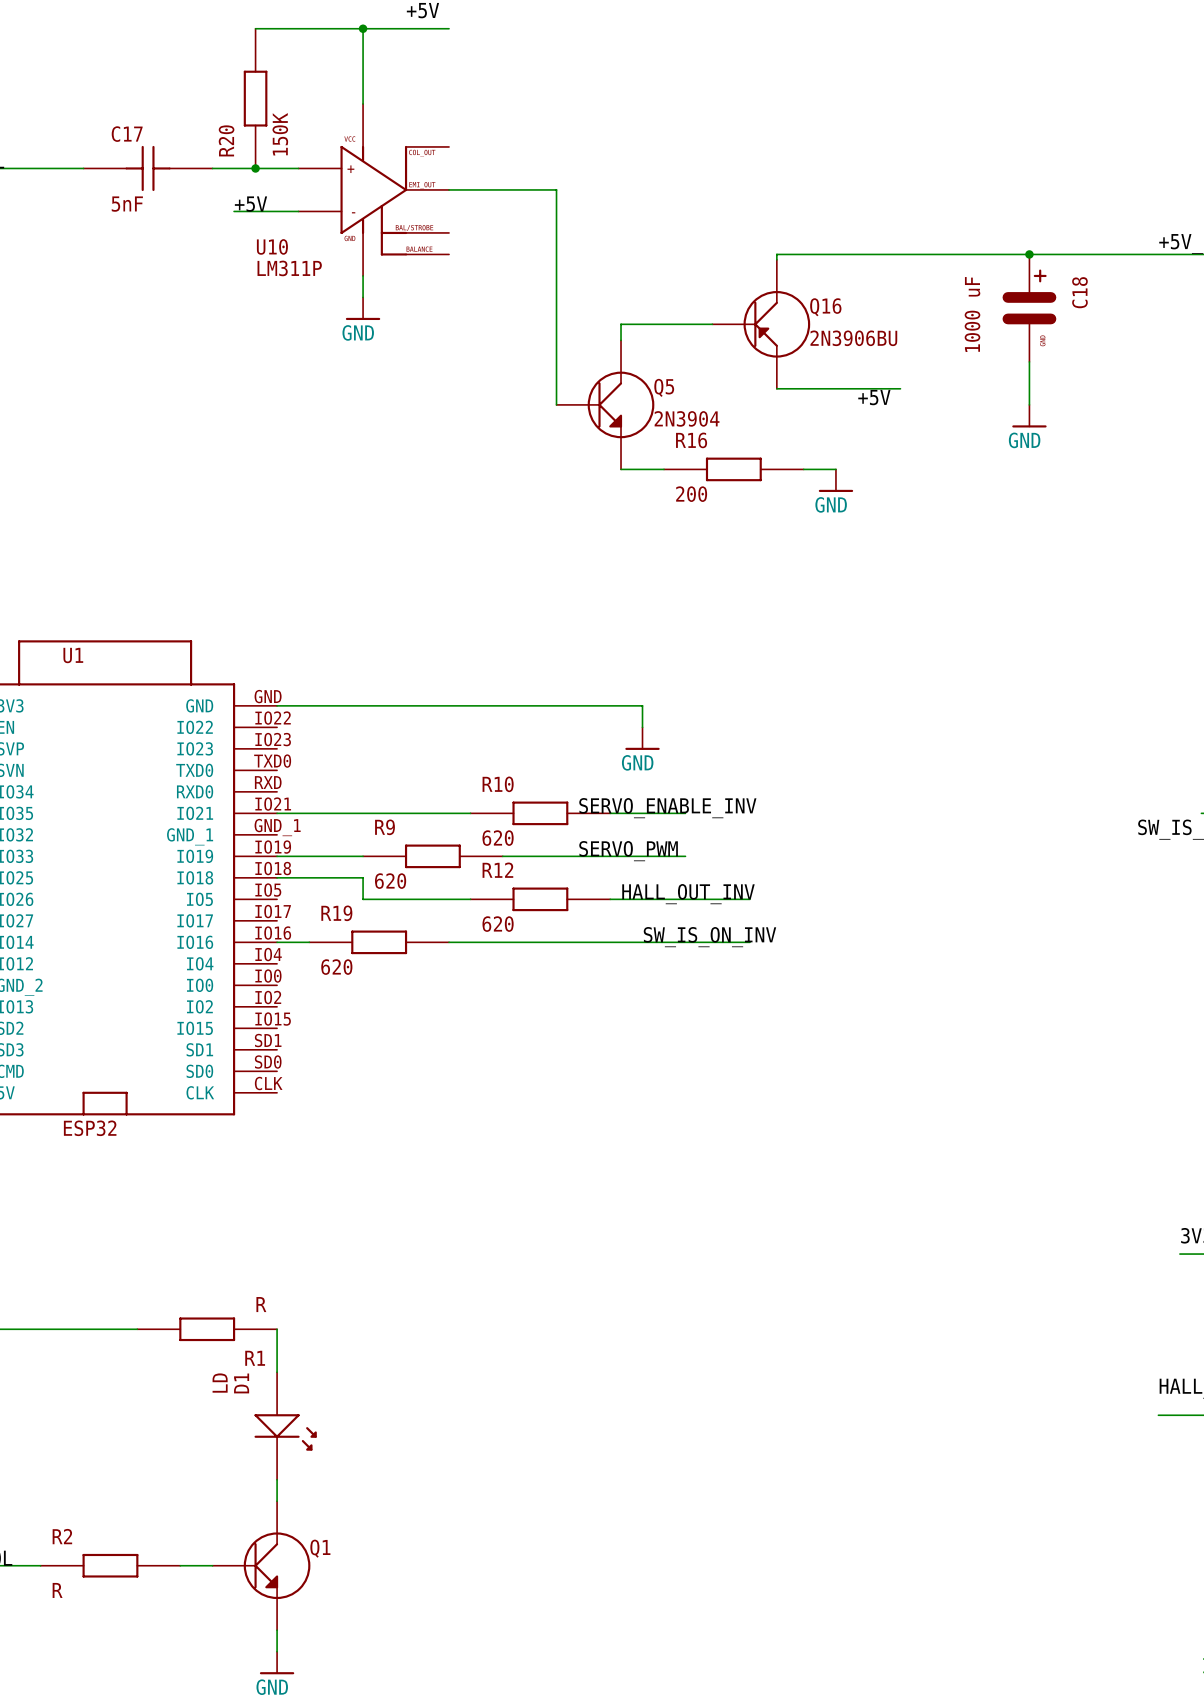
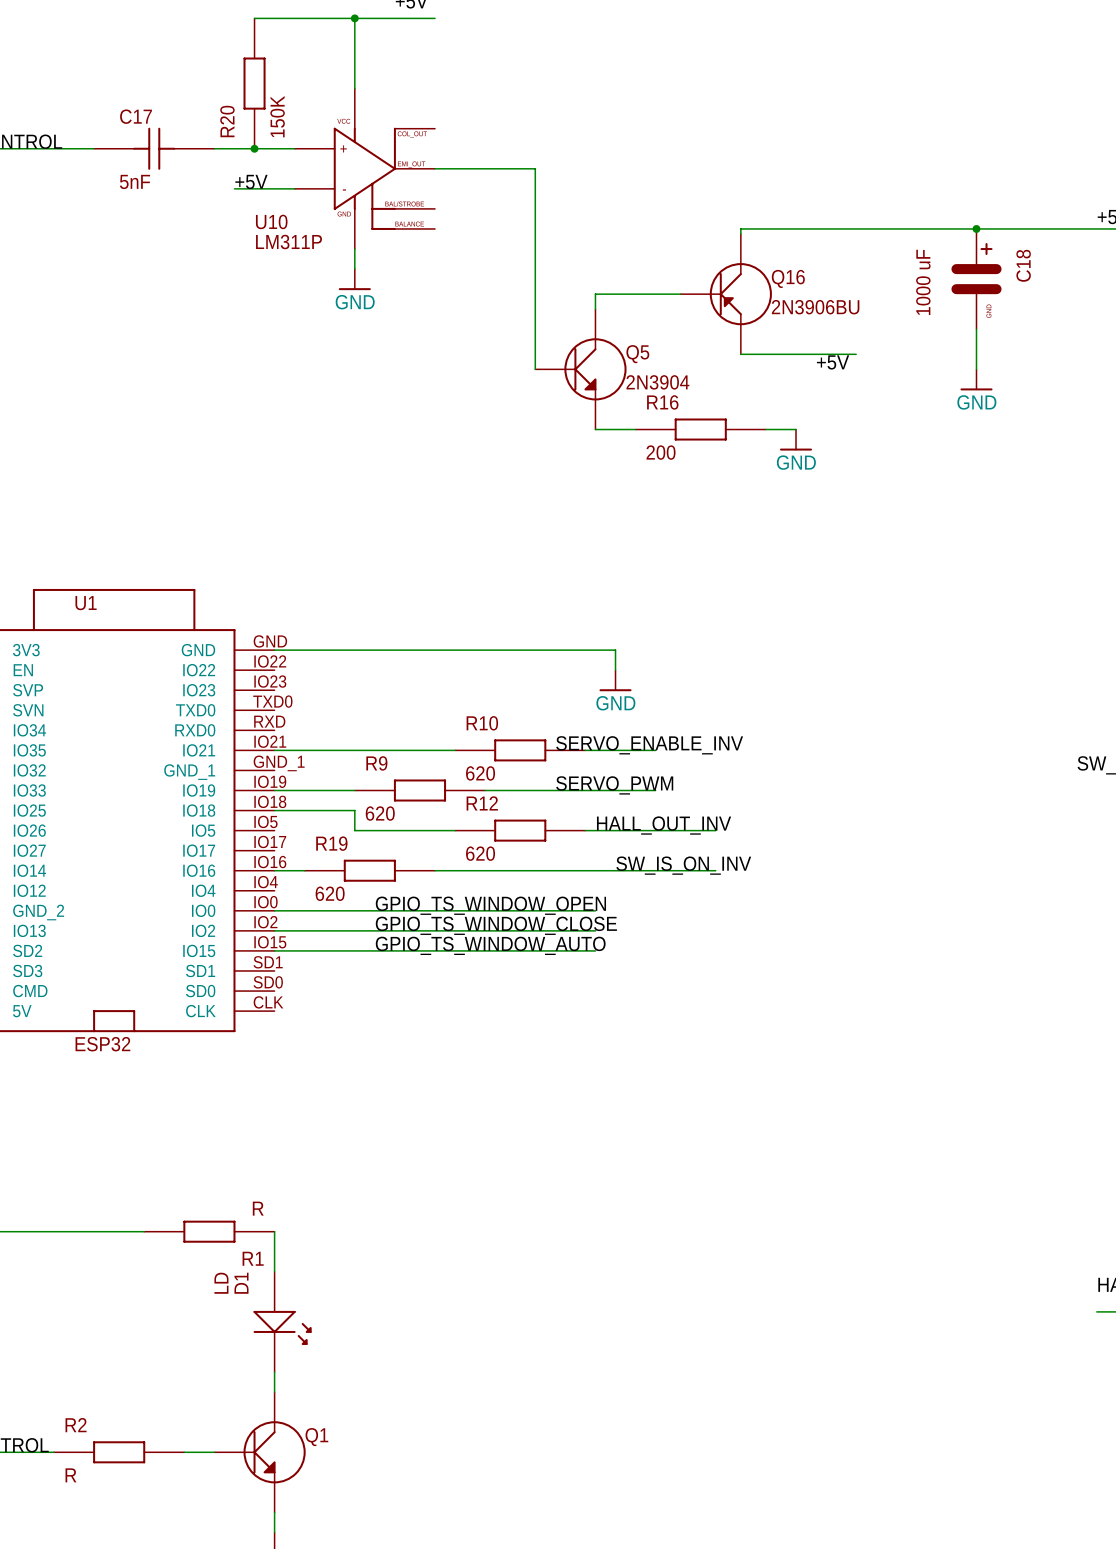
label: none -> GPIO_TS_WINDOW_OPEN (490, 905)
wire: none -> (274, 910) (595, 910)
label: none -> GPIO_TS_WINDOW_CLOSE (496, 925)
wire: none -> (274, 930) (595, 930)
label: none -> GPIO_TS_WINDOW_AUTO (490, 945)
wire: none -> (274, 950) (595, 950)

